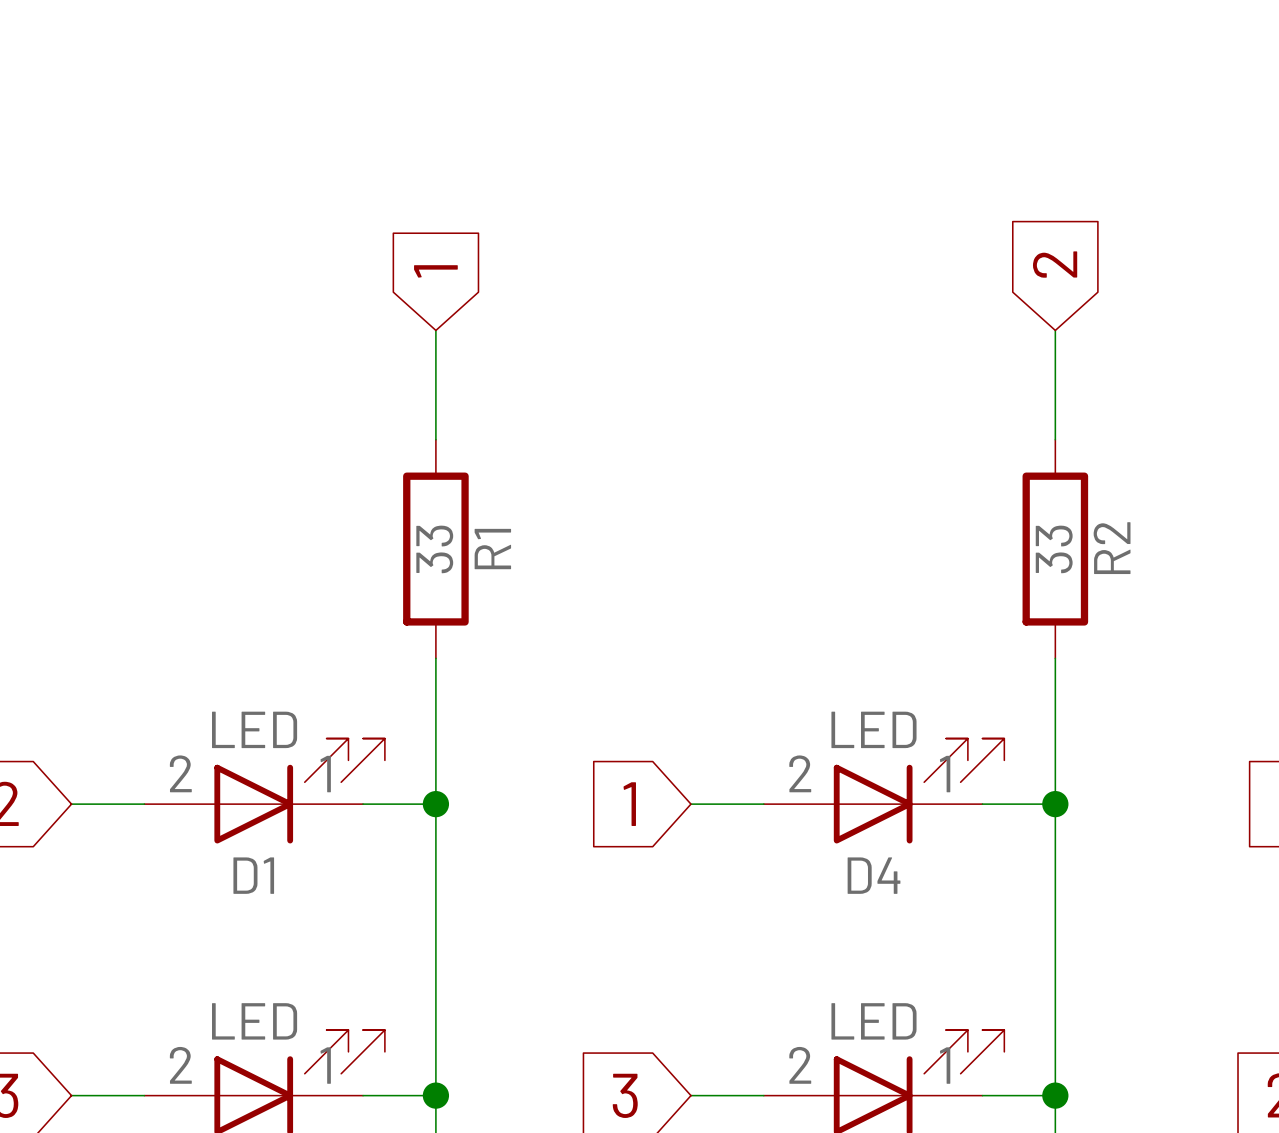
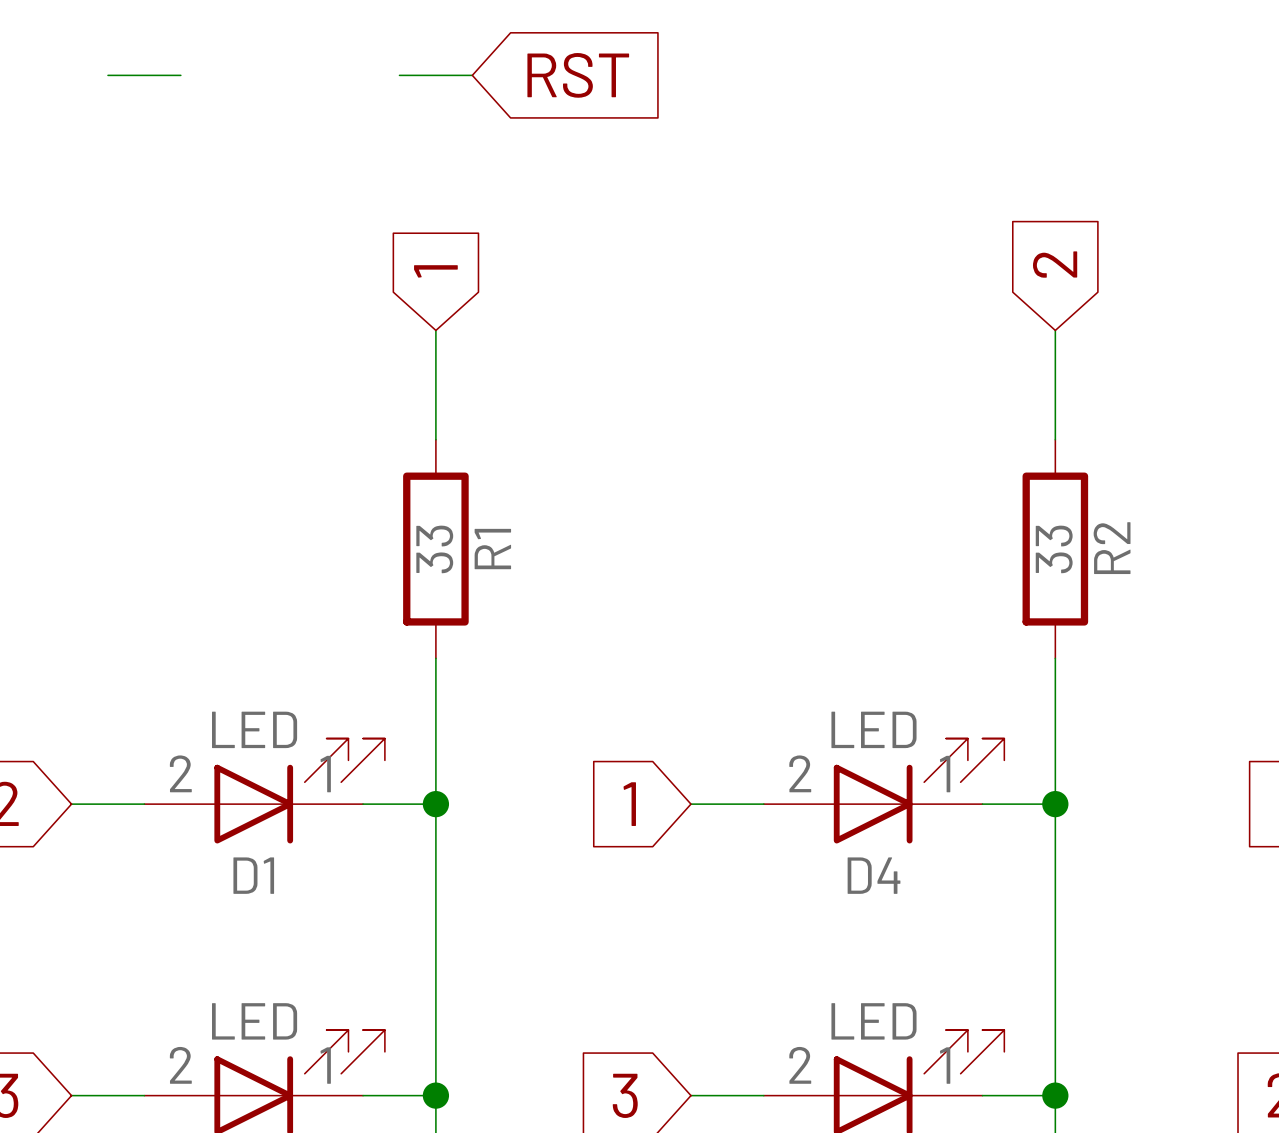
wire: none -> (107, 75) (180, 75)
wire: none -> (399, 75) (472, 75)
global label: none -> RST (578, 75)

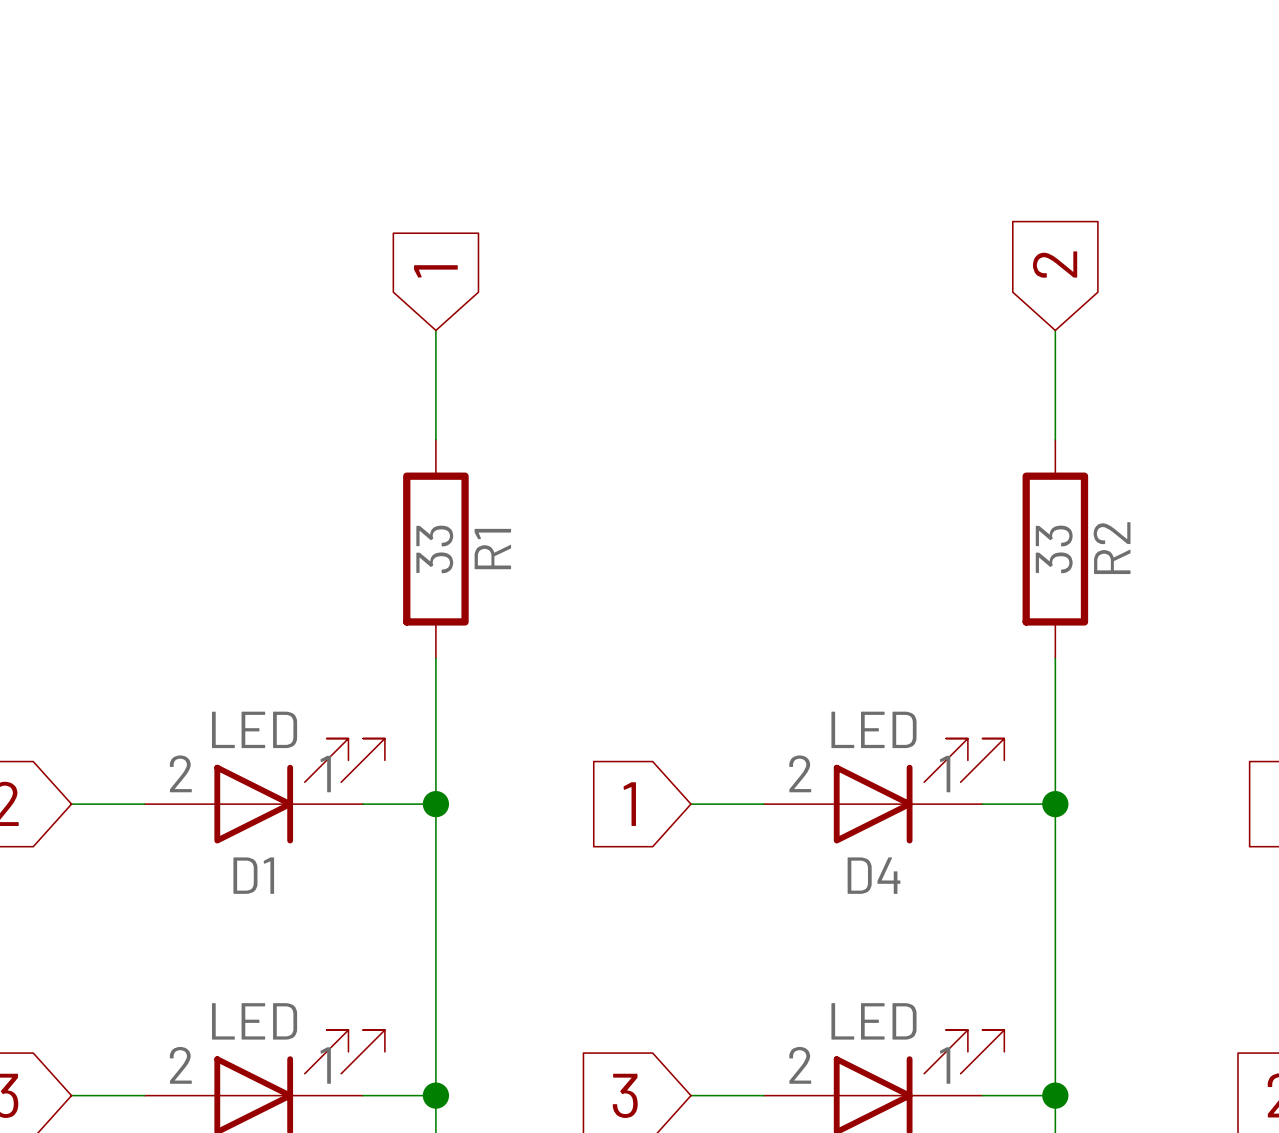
wire: (107, 75) (180, 75) -> none
wire: (399, 75) (472, 75) -> none
global label: RST (578, 75) -> none

